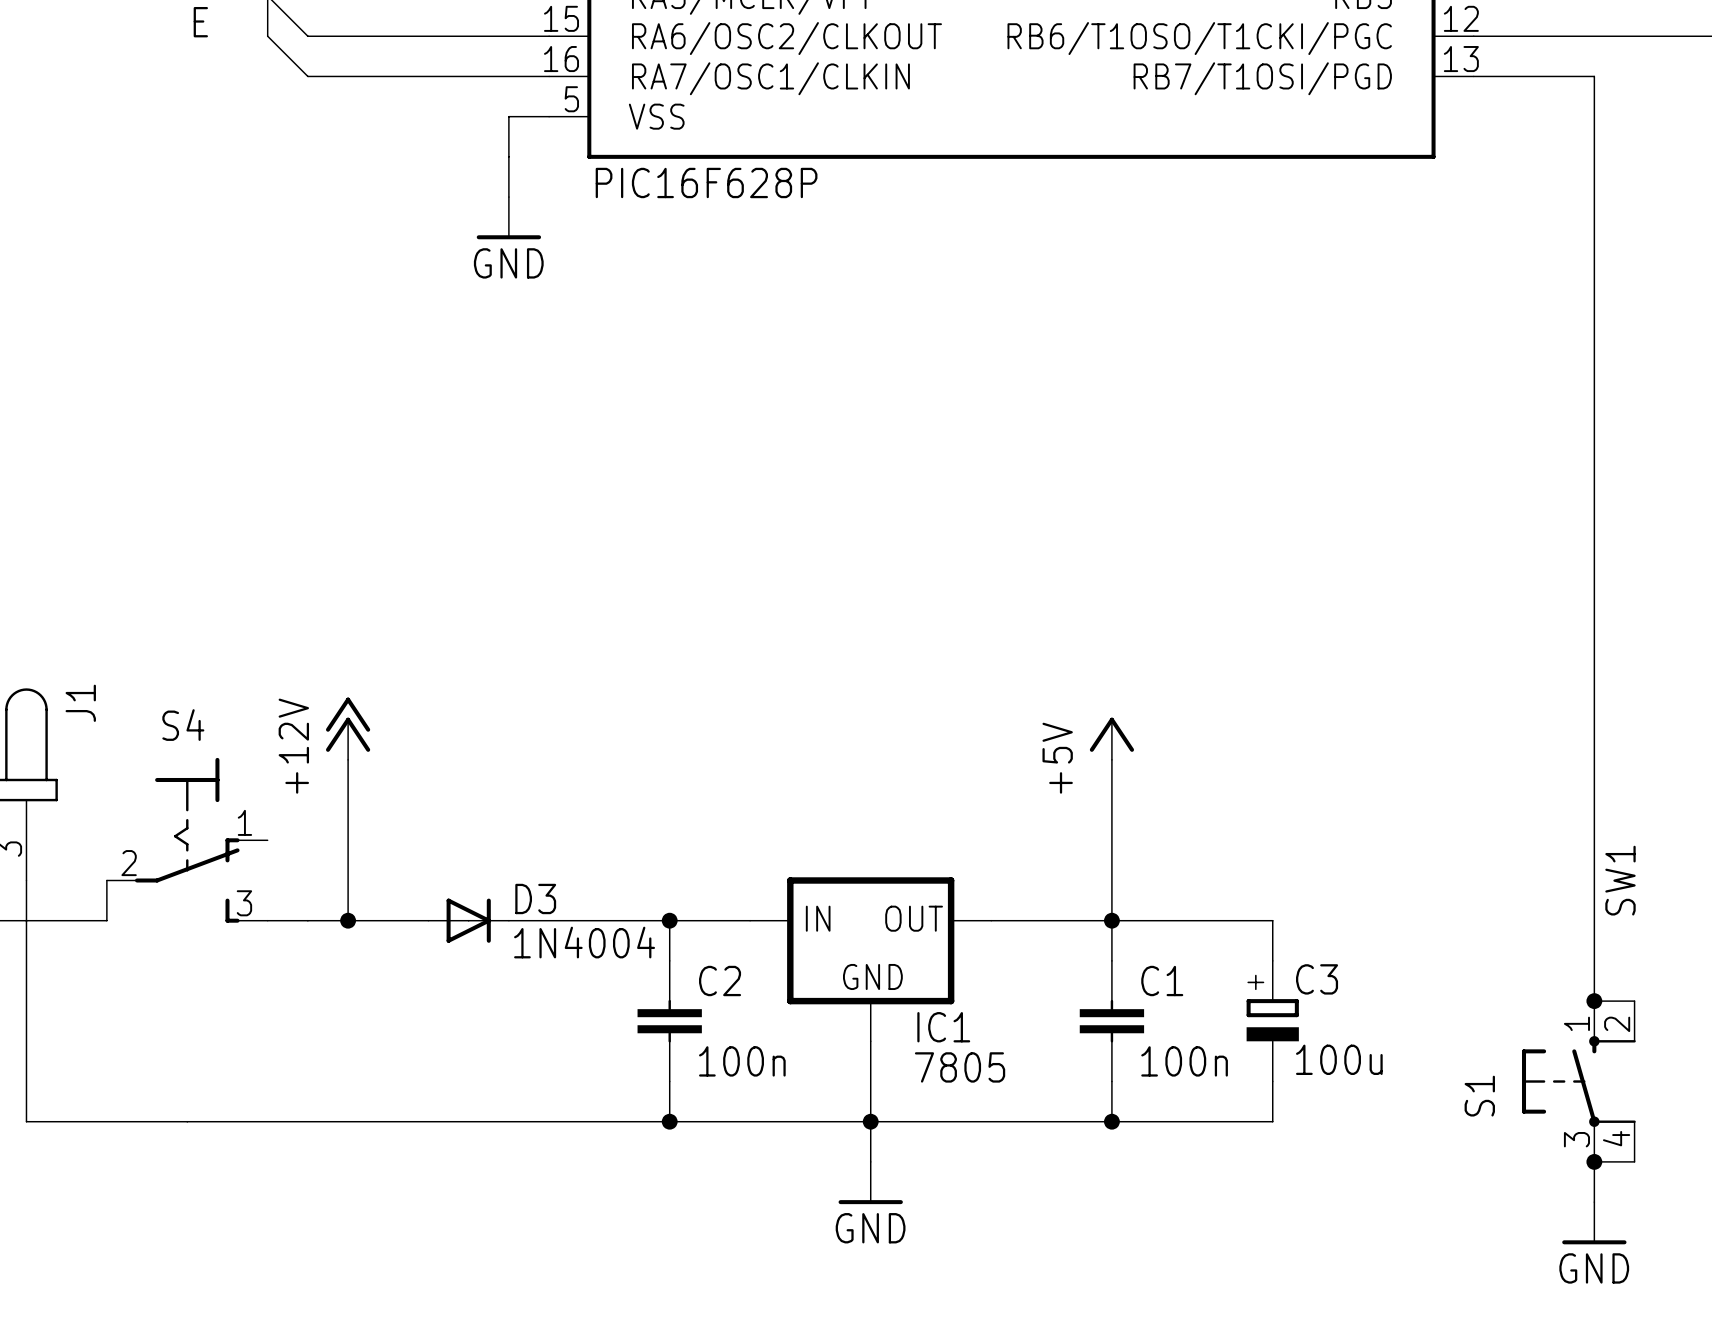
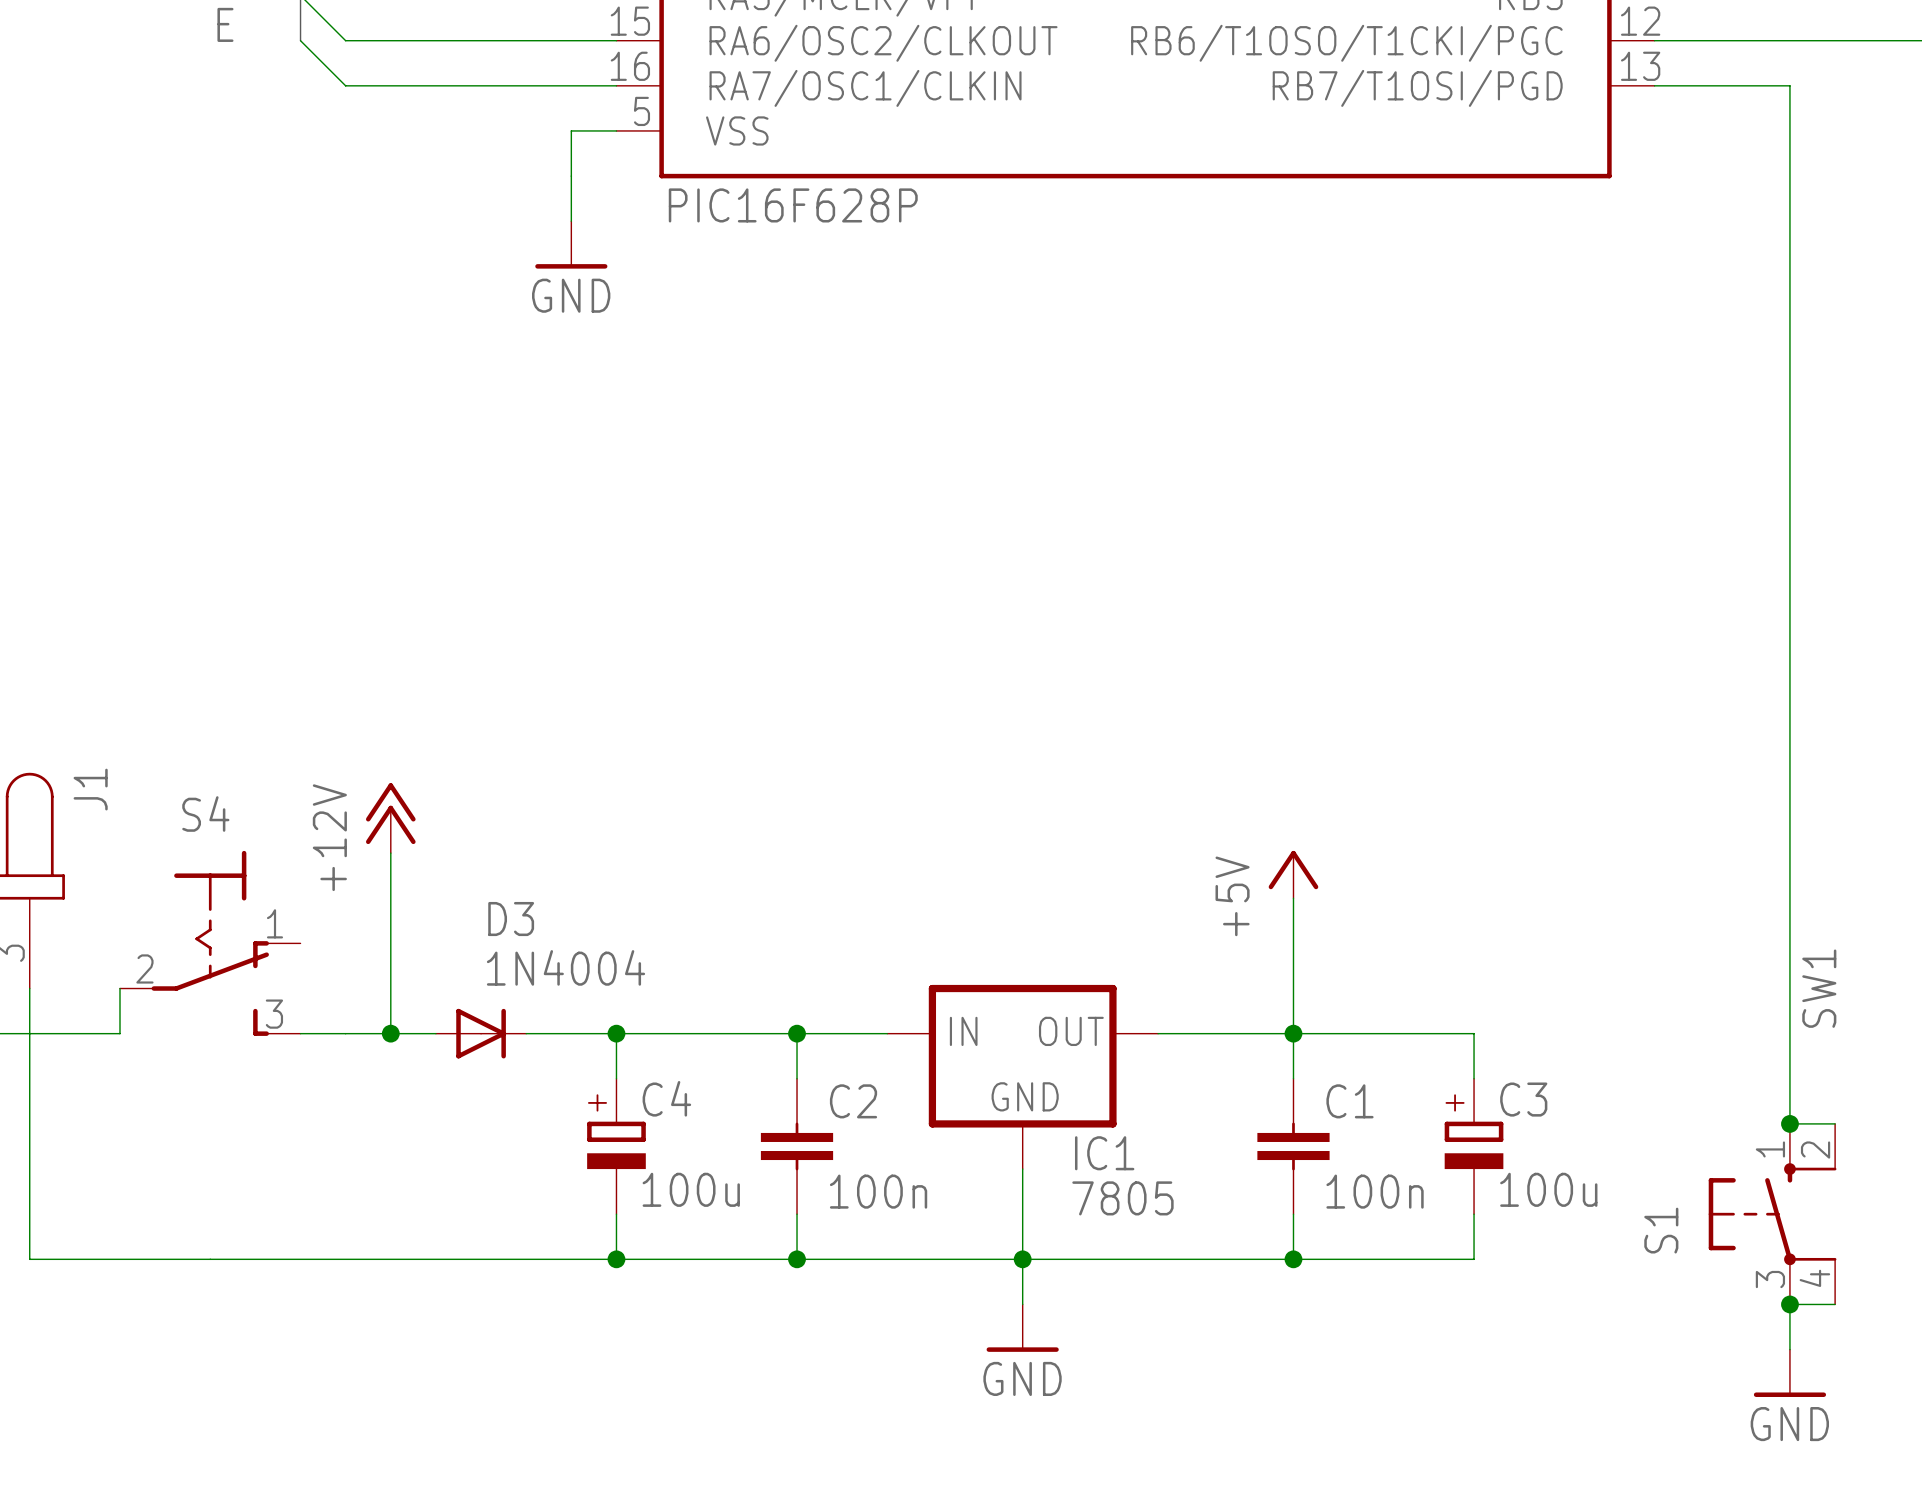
power symbol position: +5V (1111, 738) -> +5V (1293, 874)
wire: (1111, 759) (1111, 960) -> none
wire: none -> (1293, 898) (1293, 1078)
D3 name position: D3 (535, 898) -> D3 (511, 919)
D3 position: (468, 920) -> (481, 1033)
wire: none -> (616, 1033) (616, 1078)
junction: none -> (616, 1033)
wire: (669, 920) (669, 960) -> (797, 1033) (797, 1078)
junction position: (669, 920) -> (797, 1033)
junction position: (1111, 920) -> (1293, 1033)
wire: (1272, 920) (1272, 960) -> (1428, 1033) (1474, 1033) (1474, 1078)
D3 value position: 1N4004 (584, 942) -> 1N4004 (566, 967)
IC1 position: (870, 959) -> (1022, 1076)
C4: none -> 100u (616, 1146)
C2 position: (669, 1021) -> (797, 1146)
C1 position: (1111, 1021) -> (1293, 1146)
C3 position: (1272, 1021) -> (1474, 1146)
wire: (870, 1041) (870, 1161) -> (1022, 1169) (1022, 1304)
wire: none -> (616, 1214) (616, 1259)
wire: (669, 1081) (669, 1121) -> (797, 1214) (797, 1259)
wire: (1111, 1081) (1111, 1121) -> (1293, 1214) (1293, 1259)
wire: (1272, 1081) (1272, 1121) -> (1474, 1214) (1474, 1259) (1428, 1259)
junction: none -> (616, 1259)
junction position: (669, 1121) -> (797, 1259)
junction position: (870, 1121) -> (1022, 1259)
junction position: (1111, 1121) -> (1293, 1259)
power symbol position: GND (870, 1183) -> GND (1022, 1328)

